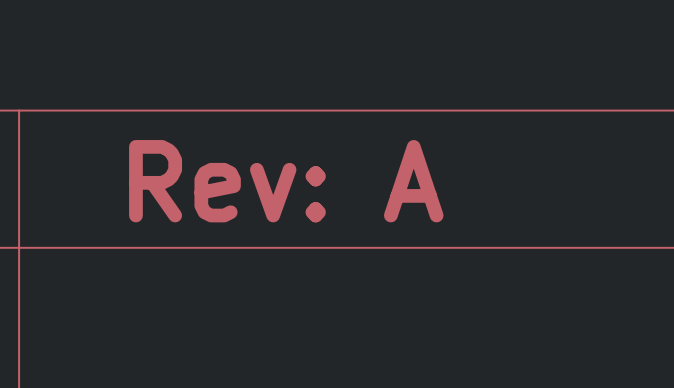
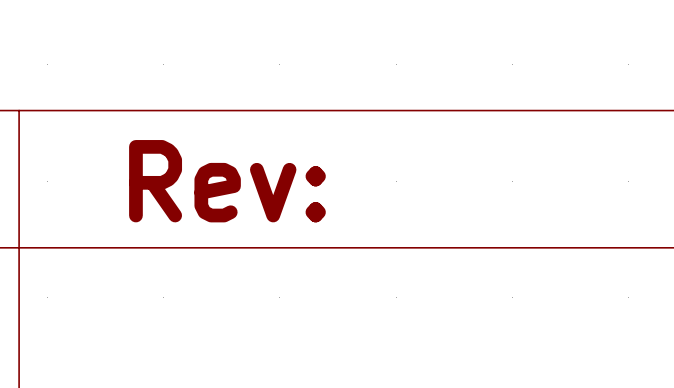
title block: Rev: A (286, 181) -> Rev: (227, 181)

